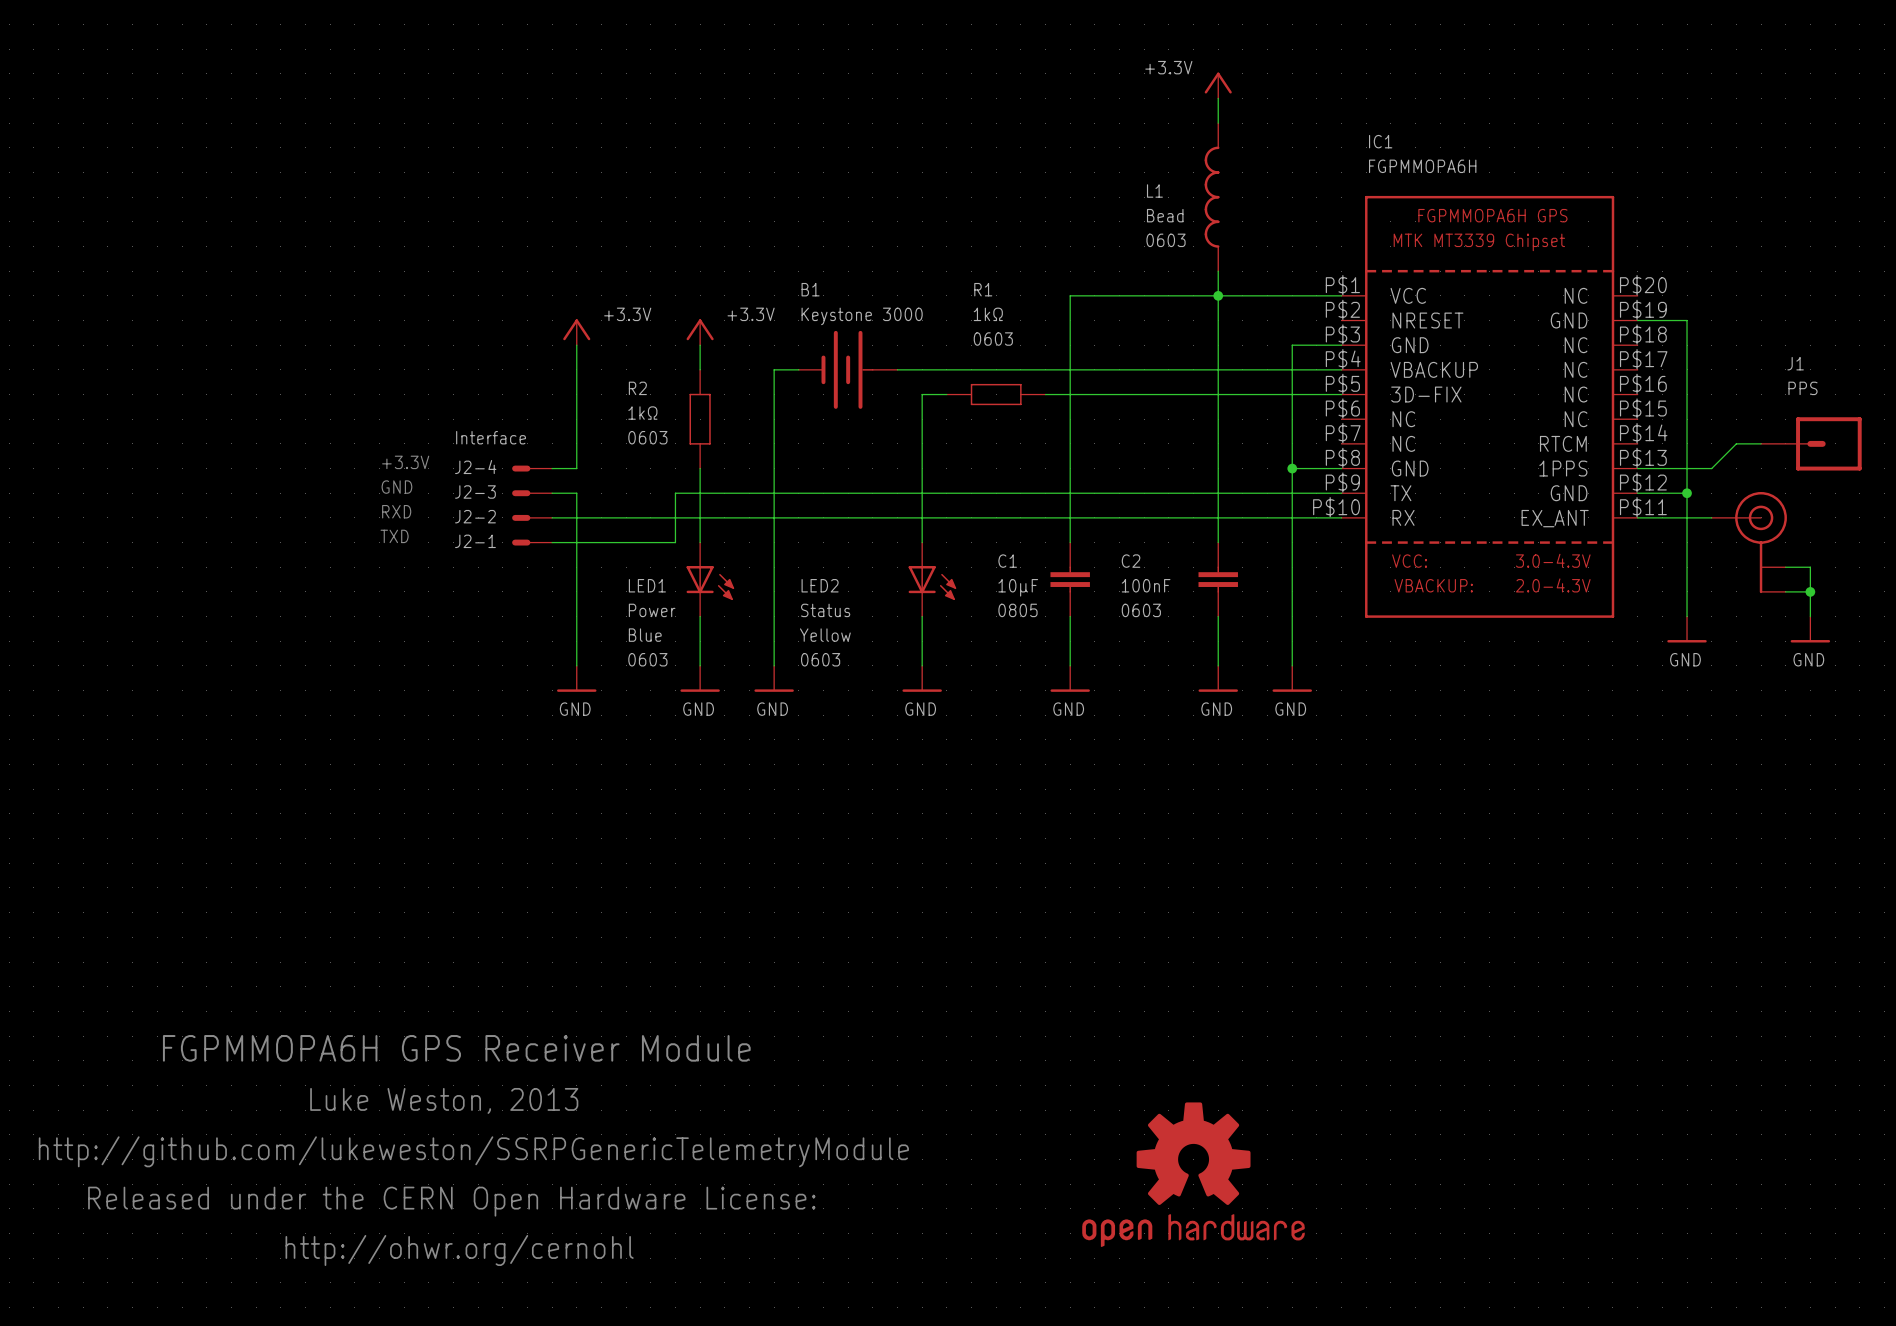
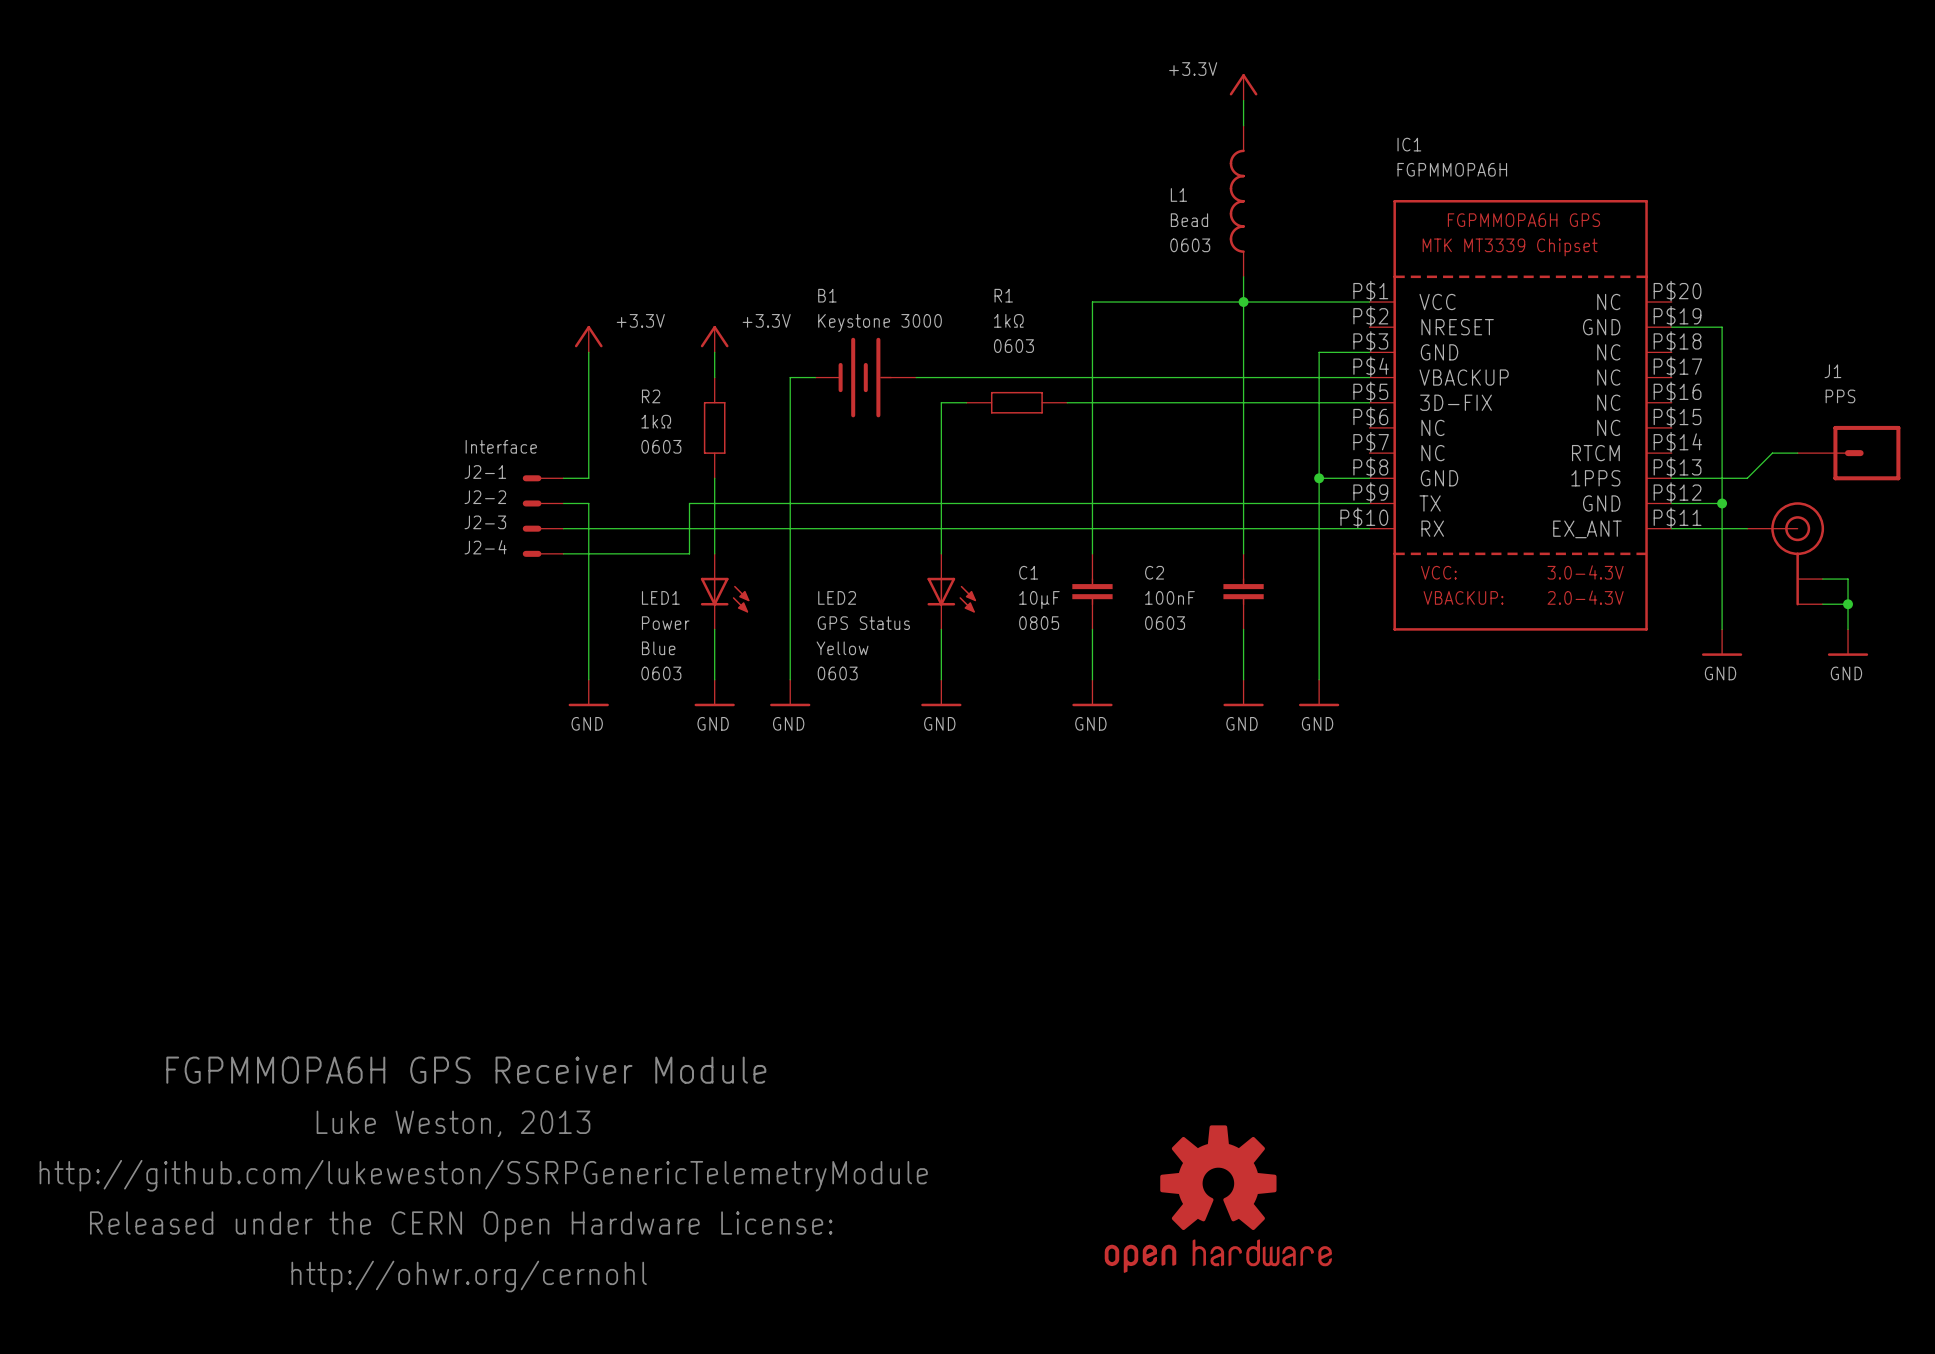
text: +3.3V (405, 462) -> none
J2-4 name: J2-4 (475, 467) -> J2-1 (485, 472)
text: GND (396, 487) -> none
J2-3 name: J2-3 (475, 491) -> J2-2 (485, 497)
text: RXD (396, 511) -> none
J2-2 name: J2-2 (475, 516) -> J2-3 (485, 522)
text: TXD (394, 536) -> none
J2-1 name: J2-1 (475, 541) -> J2-4 (485, 547)
LED2 value: Status (825, 610) -> GPS Status (863, 623)

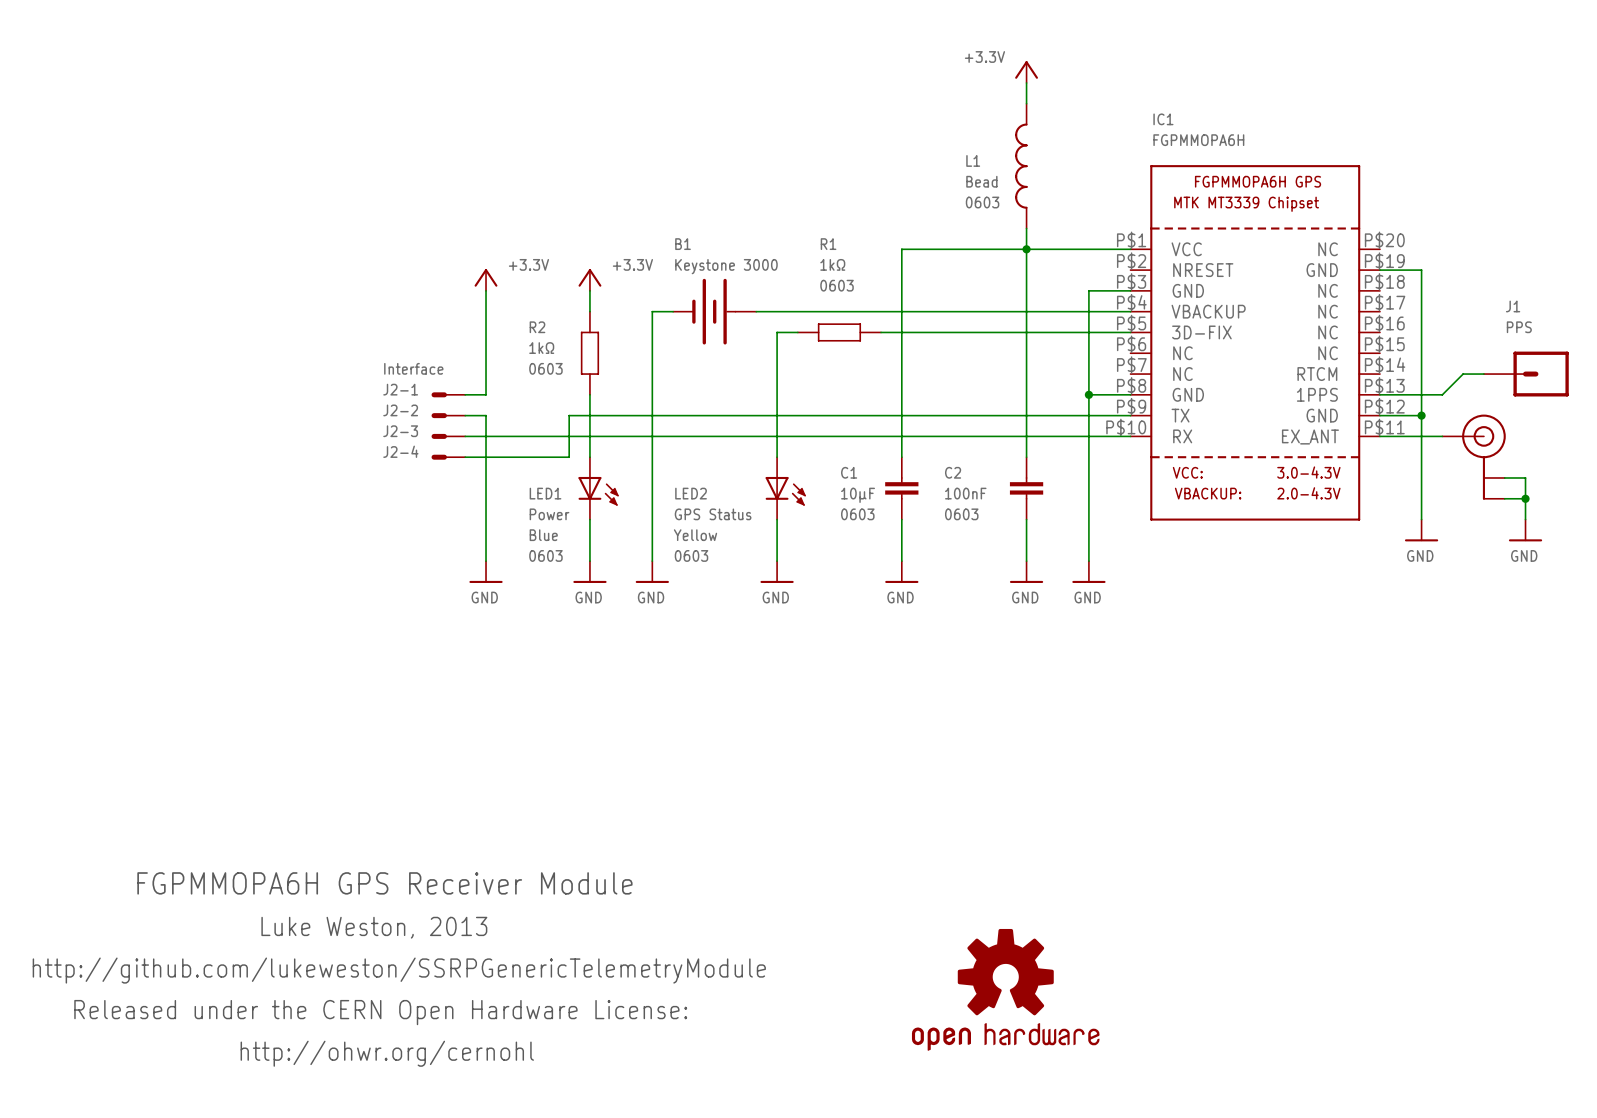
C1 text: 0805 (1039, 623) -> 0603 (857, 514)

